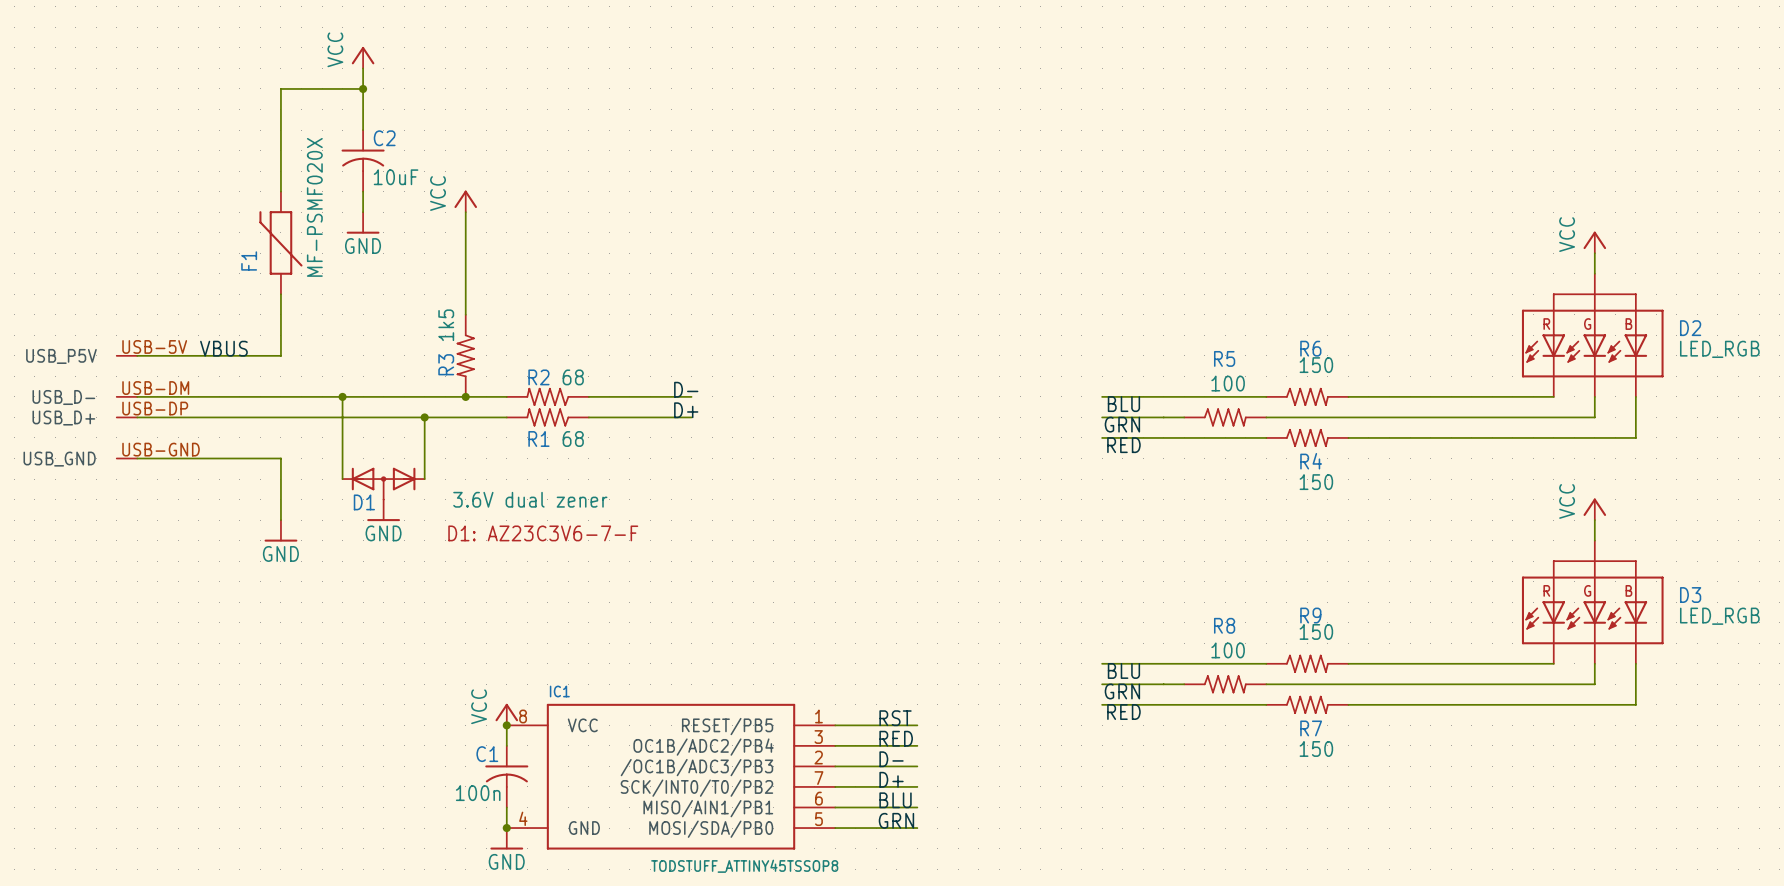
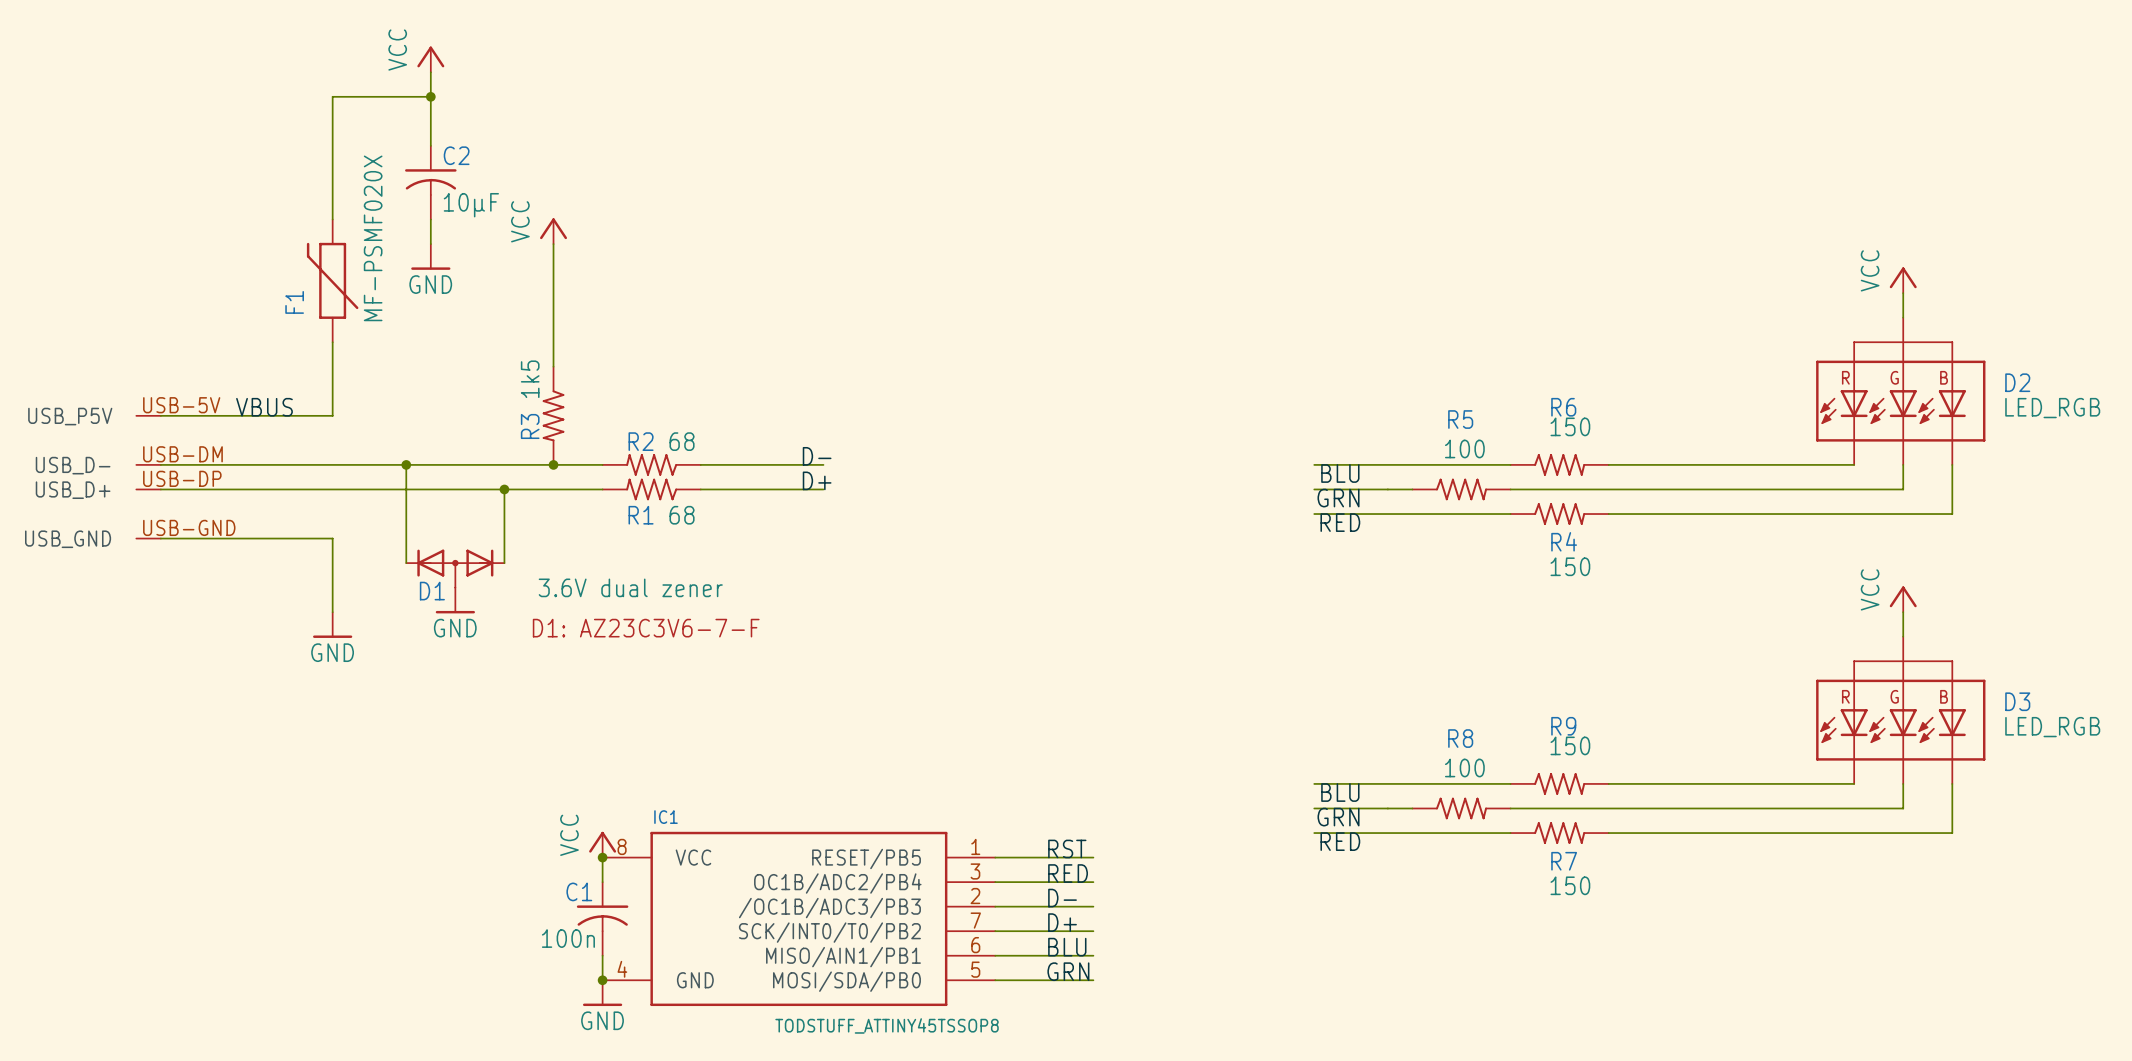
C2 value: 10uF (396, 177) -> 10µF (471, 205)

